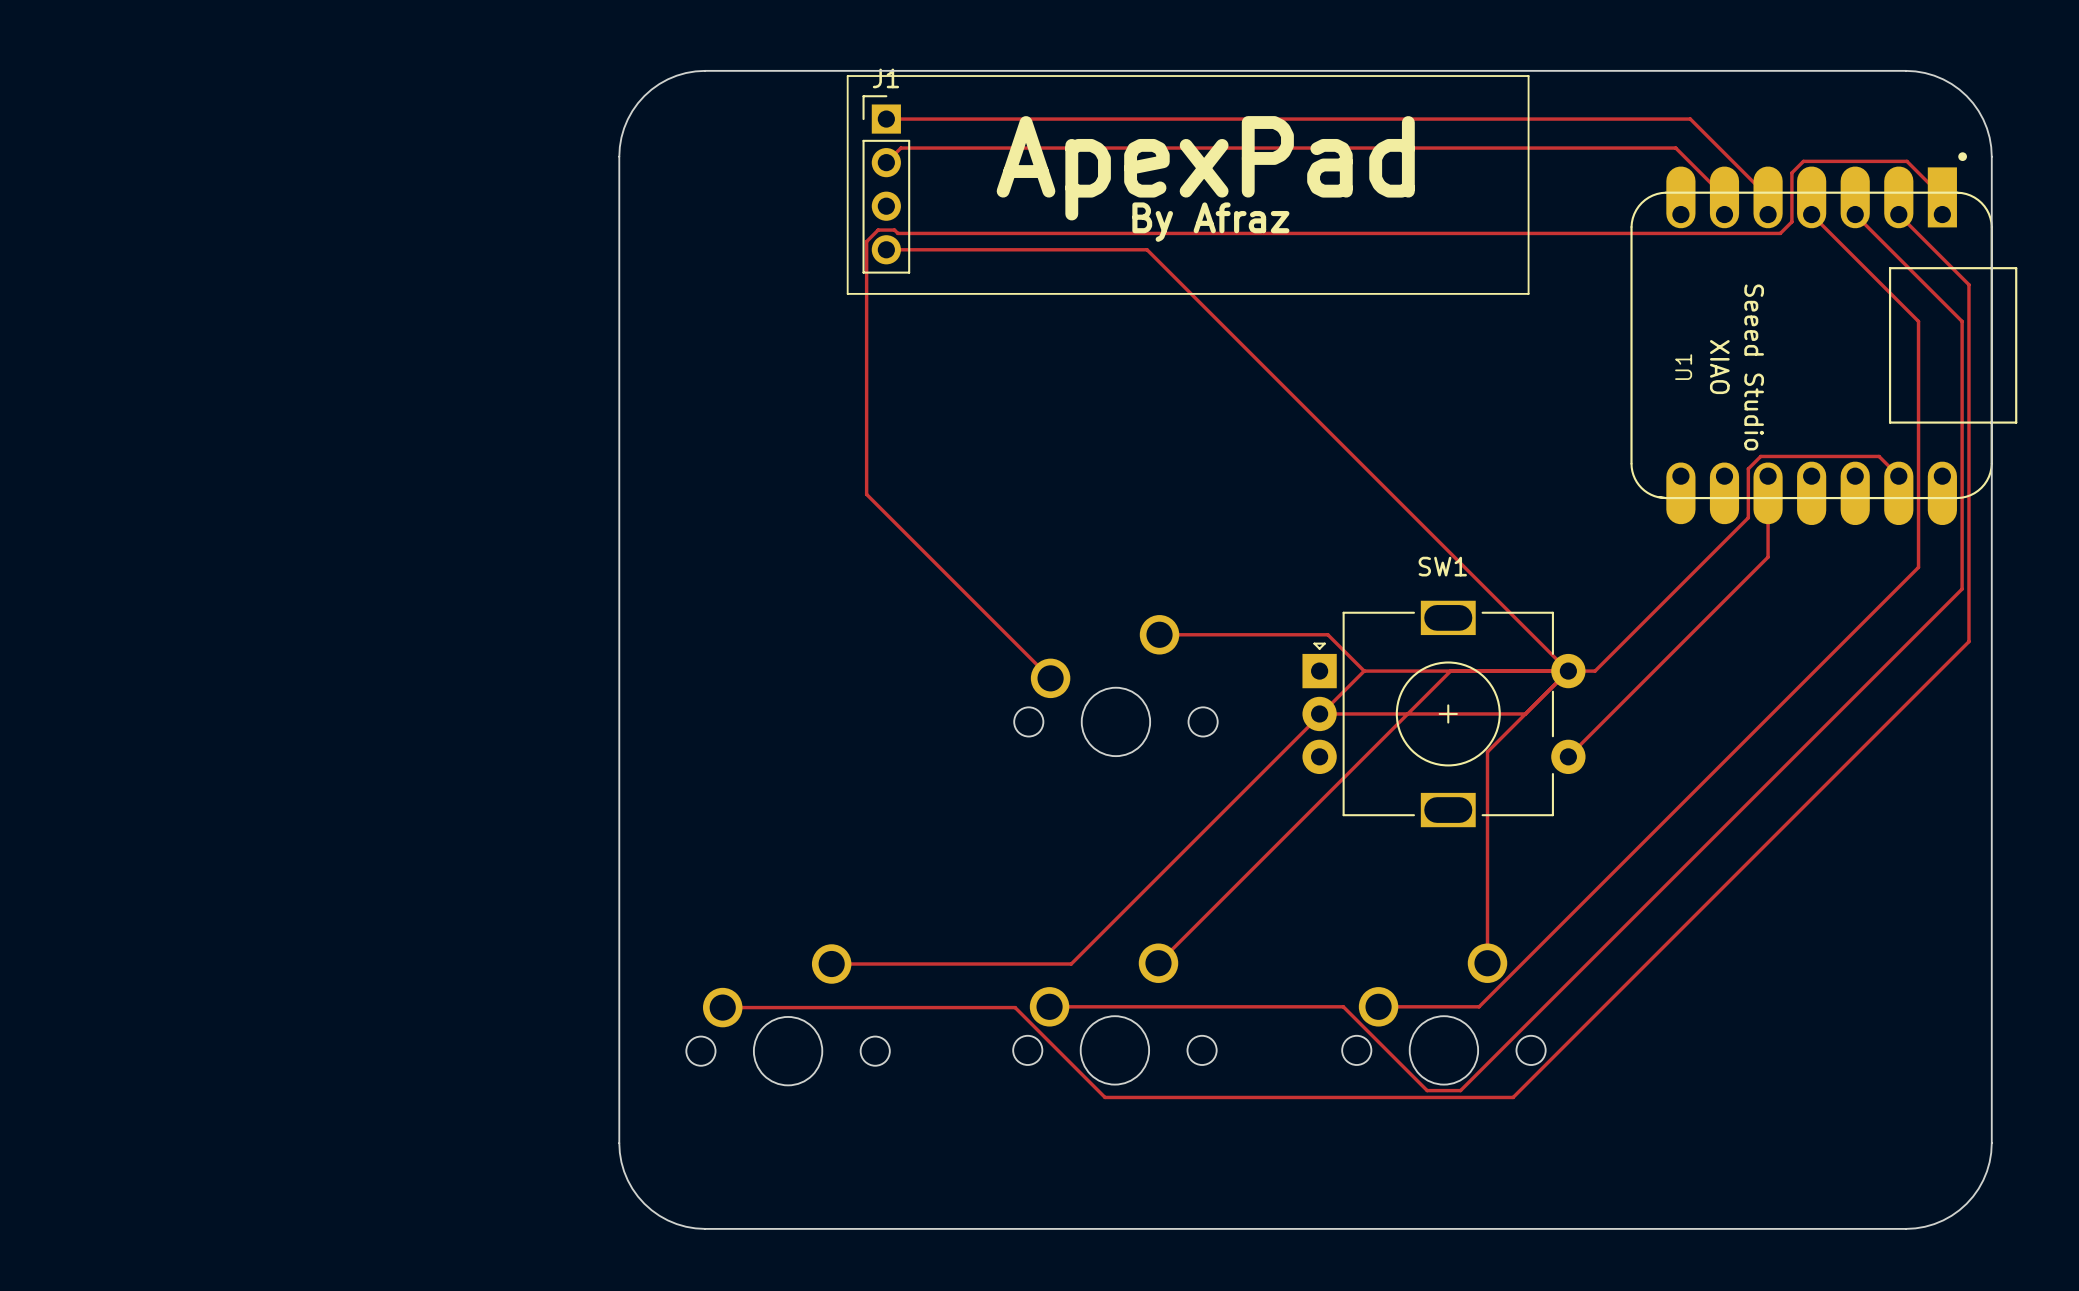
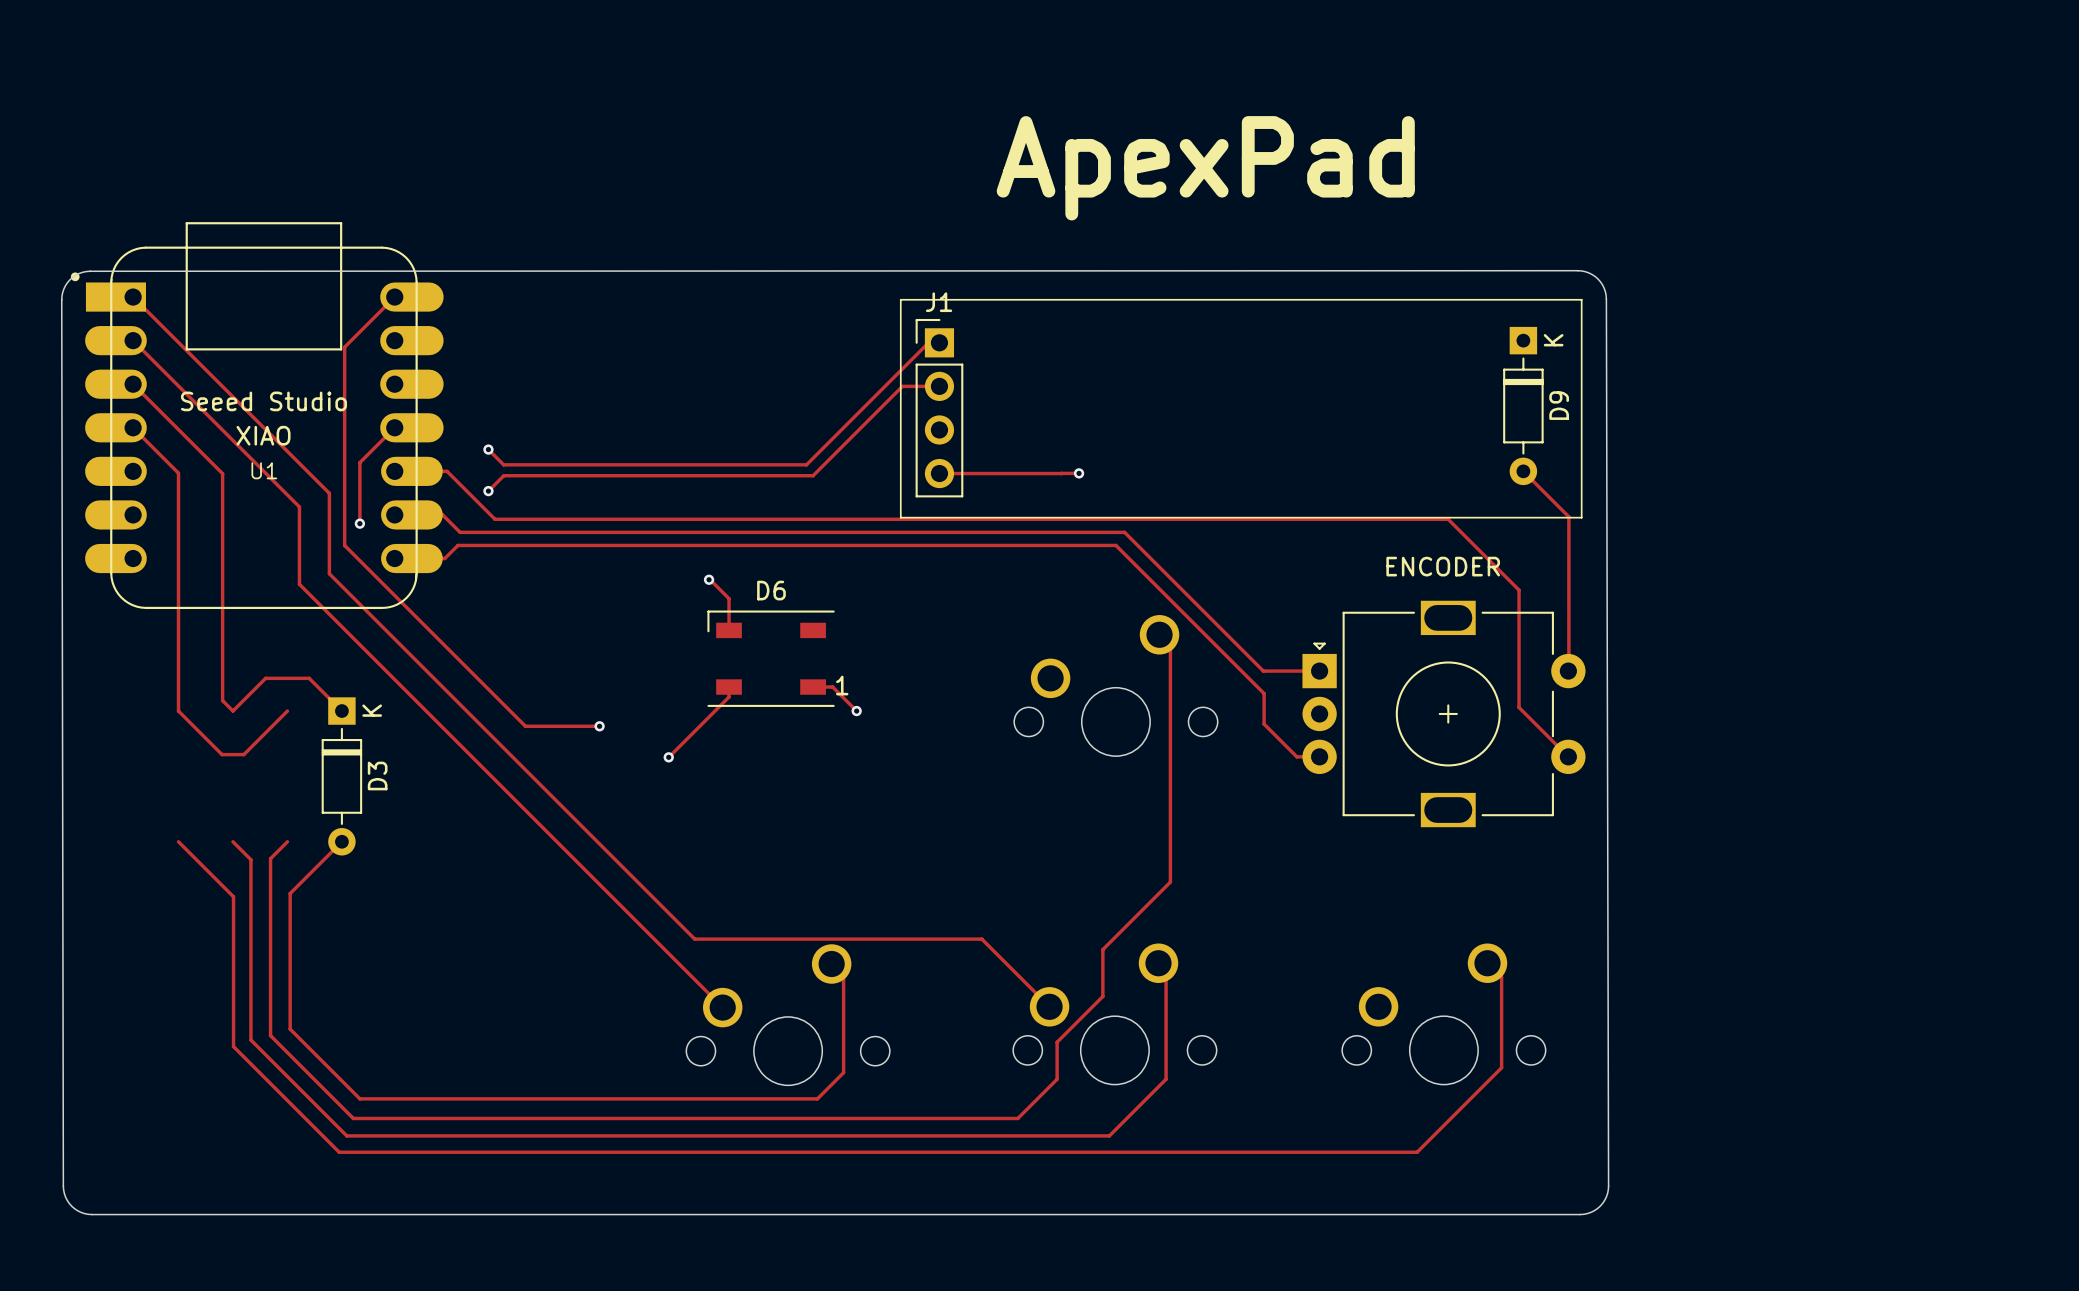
board edge: (705, 70) (1906, 70) (1934, 75) (1959, 89) (1973, 103) (1983, 119) (1989, 137) (1991, 156) (1991, 1143) (1986, 1171) (1973, 1196) (1959, 1210) (1943, 1220) (1925, 1226) (1906, 1228) (705, 1228) (676, 1224) (651, 1210) (638, 1196) (627, 1180) (621, 1162) (619, 1143) (619, 156) (624, 128) (632, 111) (644, 96) (659, 84) (676, 75) (705, 70) -> none
line: (847, 76) (1528, 76) (1528, 293) (847, 293) (847, 76) -> (900, 299) (1581, 299) (1581, 517) (900, 517) (900, 299)
track: (886, 119) (1690, 119) (1768, 196) (1768, 214) -> none
U1 footprint: [1630, 152, 2018, 526] -> [70, 222, 444, 610]
track: (886, 162) (900, 148) (1675, 148) (1724, 196) (1724, 214) -> none
J1 position: (886, 184) -> (939, 408)
track: (1811, 214) (1918, 321) (1918, 567) (1479, 1006) (1378, 1006) -> none
track: (1855, 214) (1962, 321) (1962, 589) (1460, 1090) (1427, 1090) (1343, 1006) (1049, 1006) -> (133, 297) (329, 493) (329, 573) (694, 939) (981, 939) (1049, 1006)
track: (1898, 214) (1968, 284) (1968, 641) (1513, 1097) (1105, 1097) (1015, 1007) (722, 1007) -> (133, 340) (299, 506) (299, 584) (722, 1007)
track: (1942, 214) (1942, 196) (1906, 161) (1803, 161) (1791, 172) (1791, 221) (1780, 233) (897, 233) (894, 230) (878, 230) (866, 241) (866, 494) (1050, 678) -> none
text: By Afraz (1210, 222) -> none
track: (886, 249) (1147, 249) (1568, 671) (1487, 751) (1487, 963) -> (178, 841) (233, 896) (233, 1046) (339, 1152) (1417, 1152) (1501, 1067) (1501, 977) (1487, 963)
board edge: none -> (1577, 270) (90, 271) (76, 275) (65, 285) (61, 299) (63, 1186) (67, 1200) (77, 1210) (91, 1214) (1580, 1214) (1594, 1210) (1604, 1200) (1608, 1186) (1606, 299) (1604, 288) (1598, 279) (1588, 272) (1577, 270)
track: none -> (394, 297) (344, 347) (344, 545) (525, 726) (599, 726)
track: none -> (939, 342) (928, 342) (806, 464) (503, 464) (488, 449)
U1 name position: U1 (1683, 367) -> U1 (264, 470)
track: none -> (133, 384) (222, 473) (222, 700) (232, 711) (265, 678) (309, 678) (341, 711)
track: none -> (939, 386) (902, 386) (813, 475) (503, 475) (488, 491)
D9: none -> (1523, 406)
track: none -> (133, 427) (178, 473) (178, 711) (222, 754) (243, 754) (287, 711)
track: none -> (394, 427) (359, 462) (359, 523)
via: none -> (488, 449)
track: none -> (1523, 471) (1568, 516) (1568, 671)
track: none -> (939, 473) (1061, 473)
track: none -> (1061, 473) (1079, 473)
via: none -> (1079, 473)
track: (1768, 476) (1768, 557) (1568, 756) -> (394, 471) (447, 471) (494, 519) (1448, 519) (1519, 590) (1519, 707) (1568, 756)
track: (1898, 476) (1879, 456) (1760, 456) (1748, 468) (1748, 517) (1595, 671) (1364, 671) -> none
via: none -> (488, 491)
track: none -> (394, 514) (442, 514) (460, 532) (1124, 532) (1263, 671) (1319, 671)
via: none -> (359, 523)
track: none -> (394, 558) (444, 558) (457, 545) (1115, 545) (1264, 693) (1264, 724) (1296, 756) (1319, 756)
SW1 name: SW1 (1442, 566) -> ENCODER (1443, 566)
track: none -> (709, 579) (729, 598) (729, 630)
via: none -> (709, 579)
track: (1159, 634) (1327, 634) (1364, 671) -> (1159, 634) (1170, 645) (1170, 882) (1102, 949) (1102, 996) (1057, 1042) (1057, 1079) (1017, 1118) (353, 1118) (270, 1035) (270, 858) (287, 841)
D6: none -> (771, 658)
track: (1364, 671) (1071, 964) (831, 964) -> (341, 841) (290, 893) (290, 1029) (359, 1098) (817, 1098) (843, 1072) (843, 975) (831, 964)
track: (1450, 671) (1158, 963) -> (232, 841) (250, 859) (250, 1040) (346, 1135) (1109, 1135) (1166, 1079) (1166, 970) (1158, 963)
track: none -> (729, 687) (729, 697) (668, 757)
track: none -> (813, 687) (832, 687) (856, 711)
via: none -> (856, 711)
track: (1319, 713) (1525, 713) -> none
via: none -> (599, 726)
via: none -> (668, 757)
D3: none -> (341, 776)

